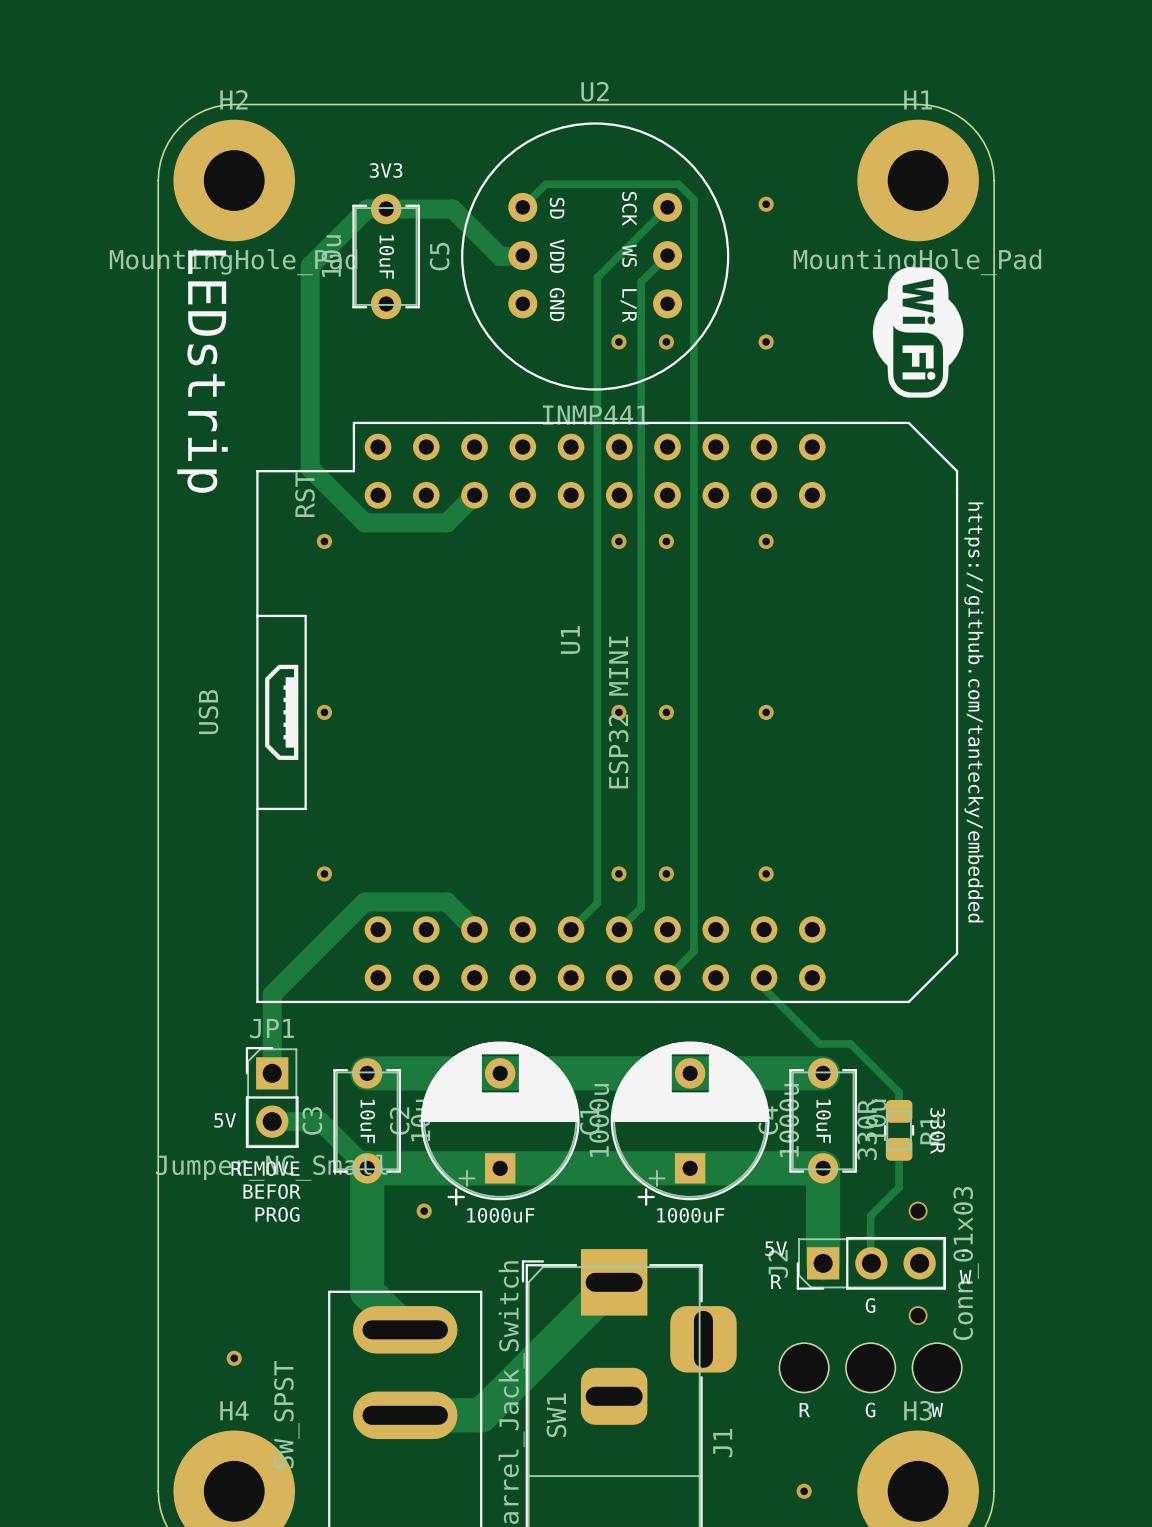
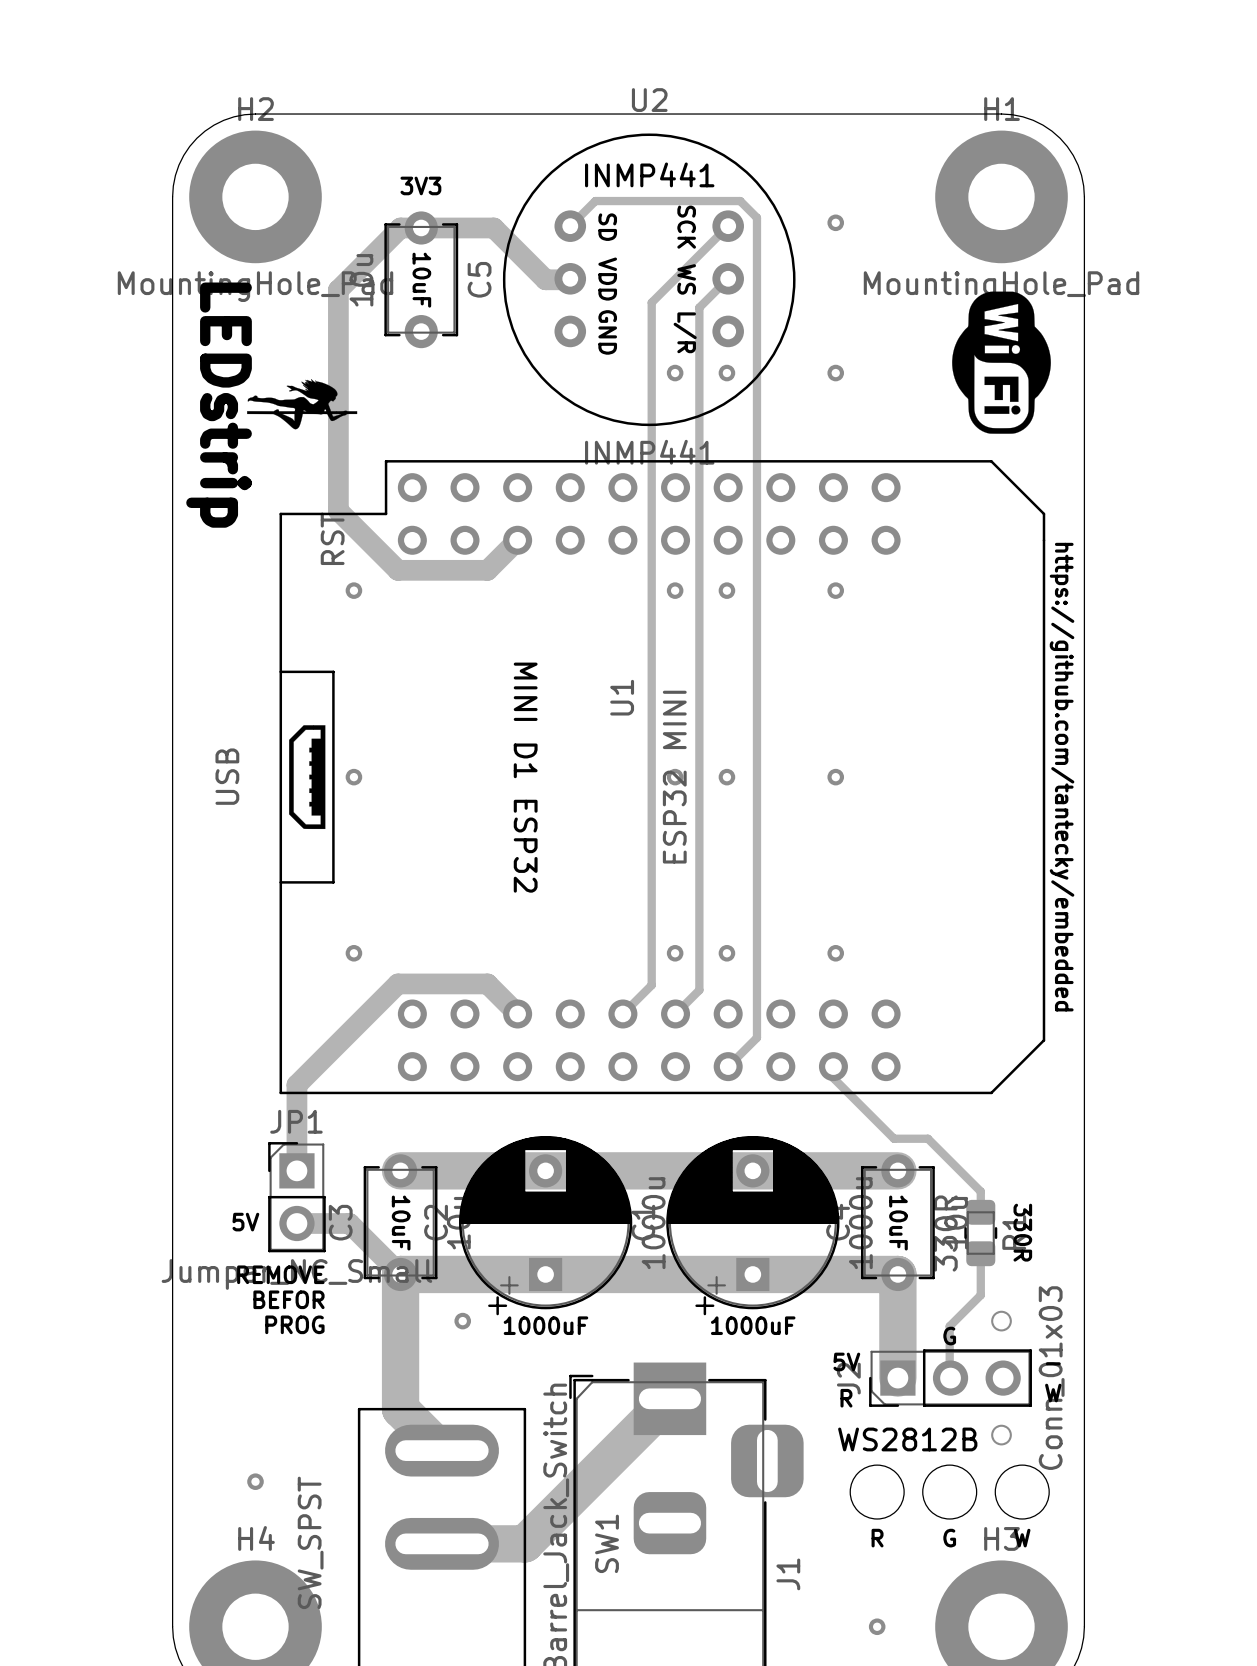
text: none -> INMP441 (649, 174)
drawing: none -> [247, 379, 358, 430]
text: none -> MINI D1 ESP32 (525, 777)
text position: G (870, 1305) -> G (949, 1336)
text: none -> WS2812B (907, 1439)

